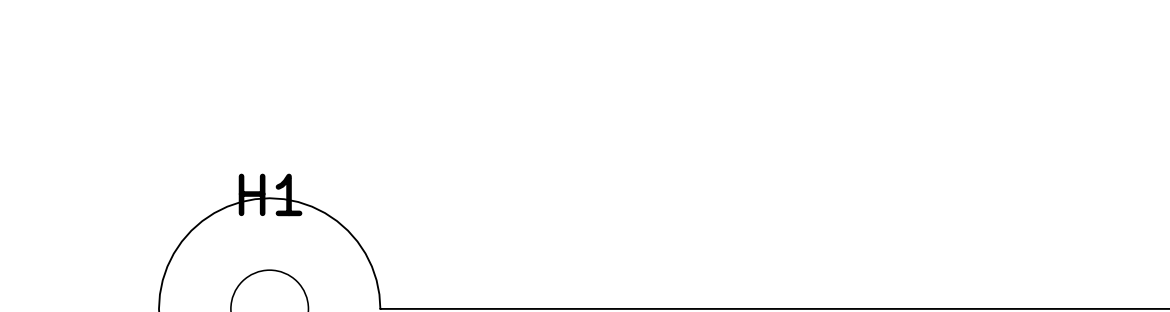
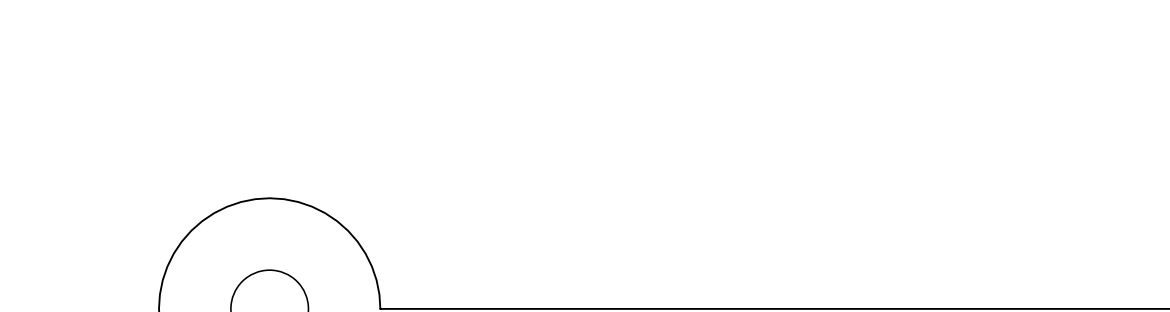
H1 name: H1 (270, 194) -> none

